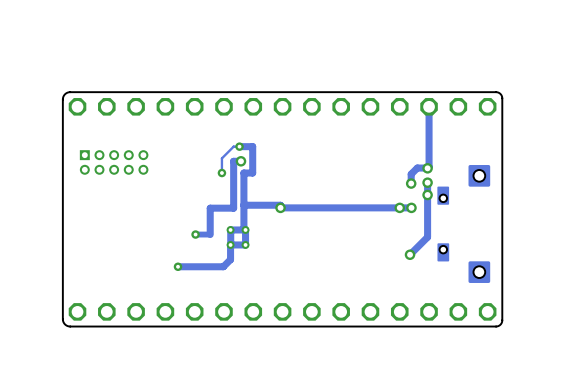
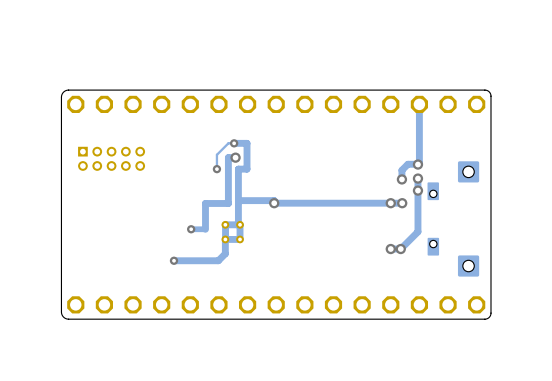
via: none -> (390, 249)

